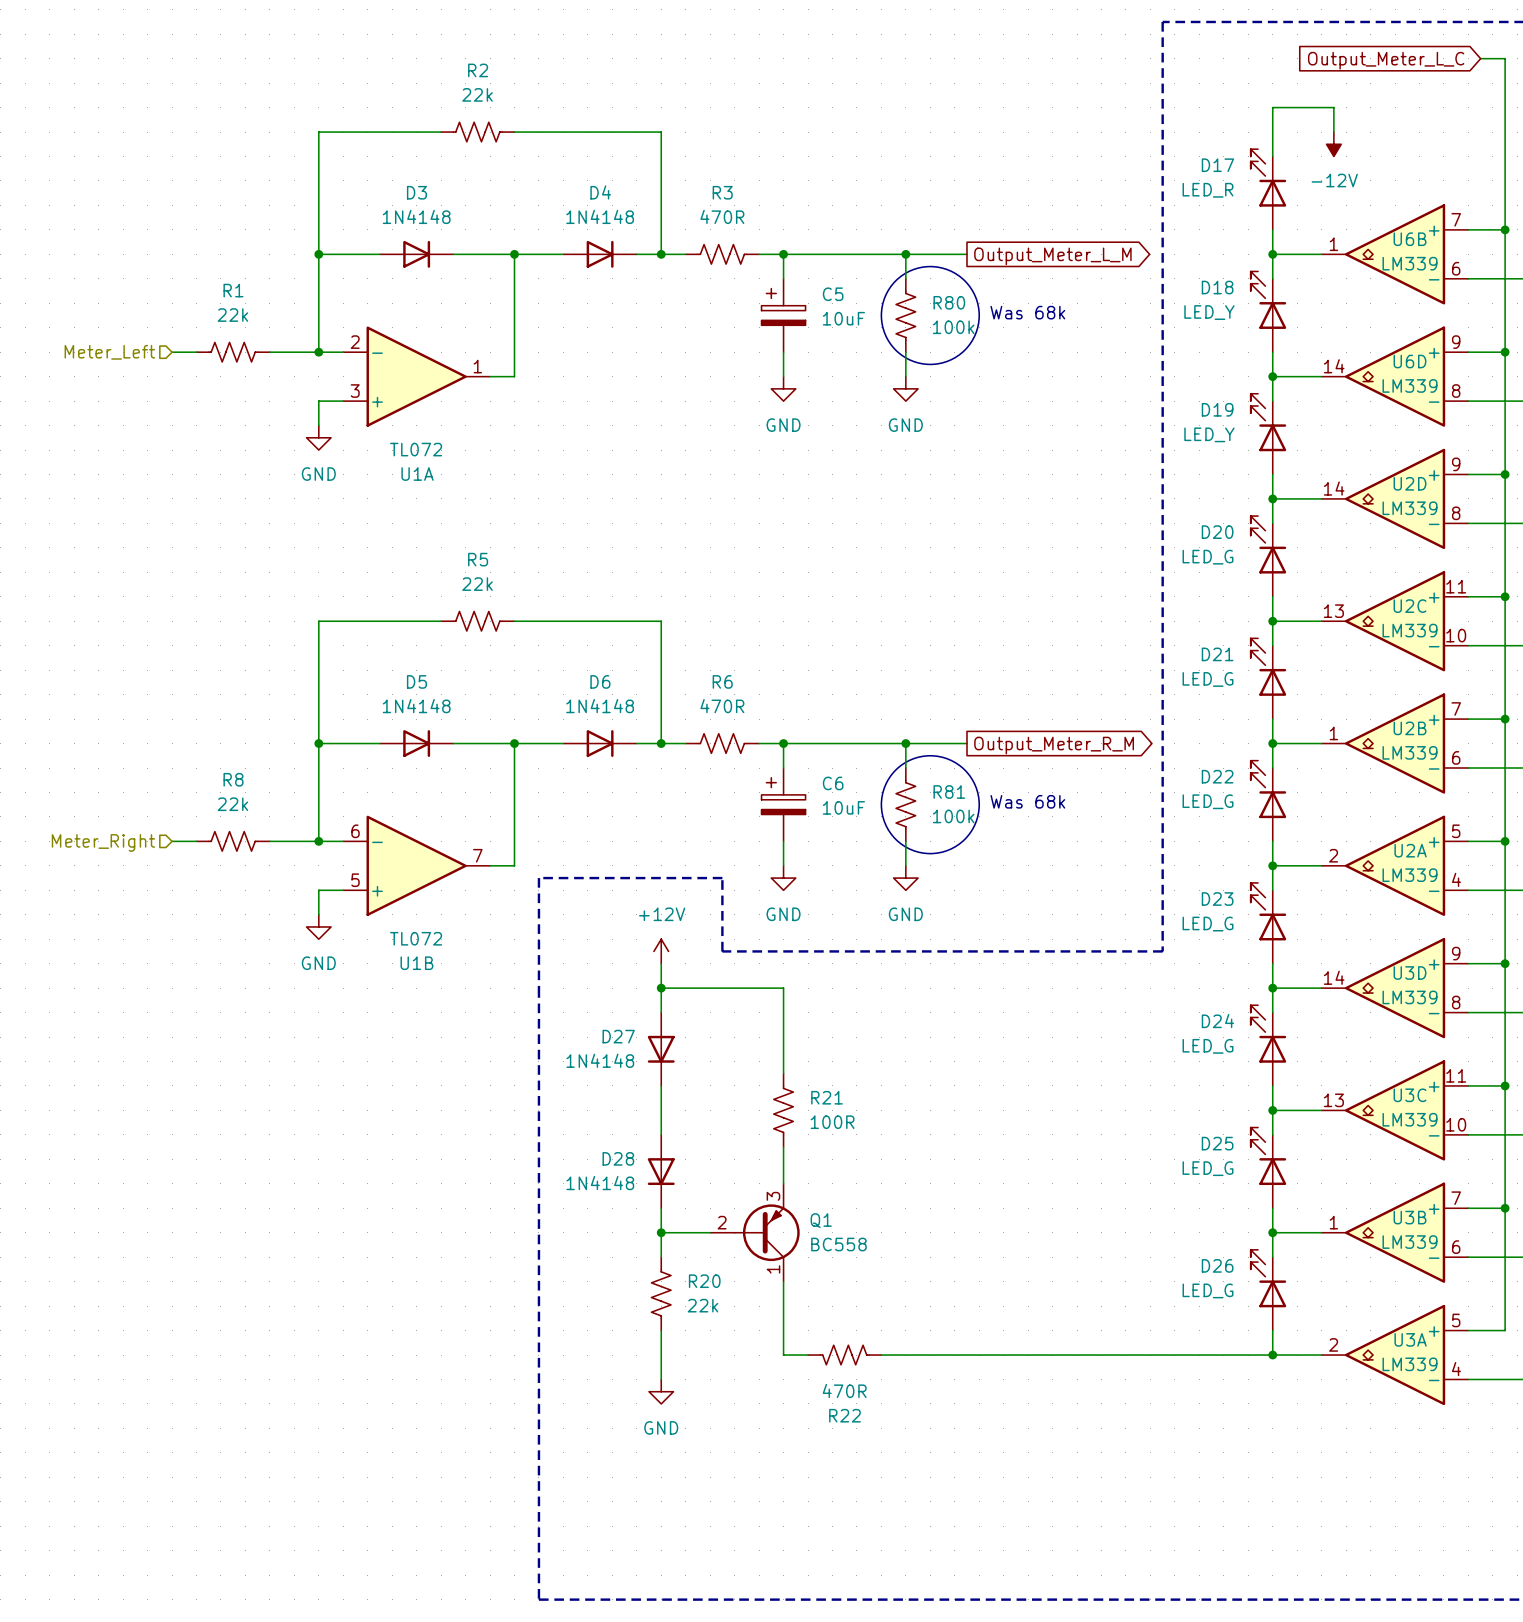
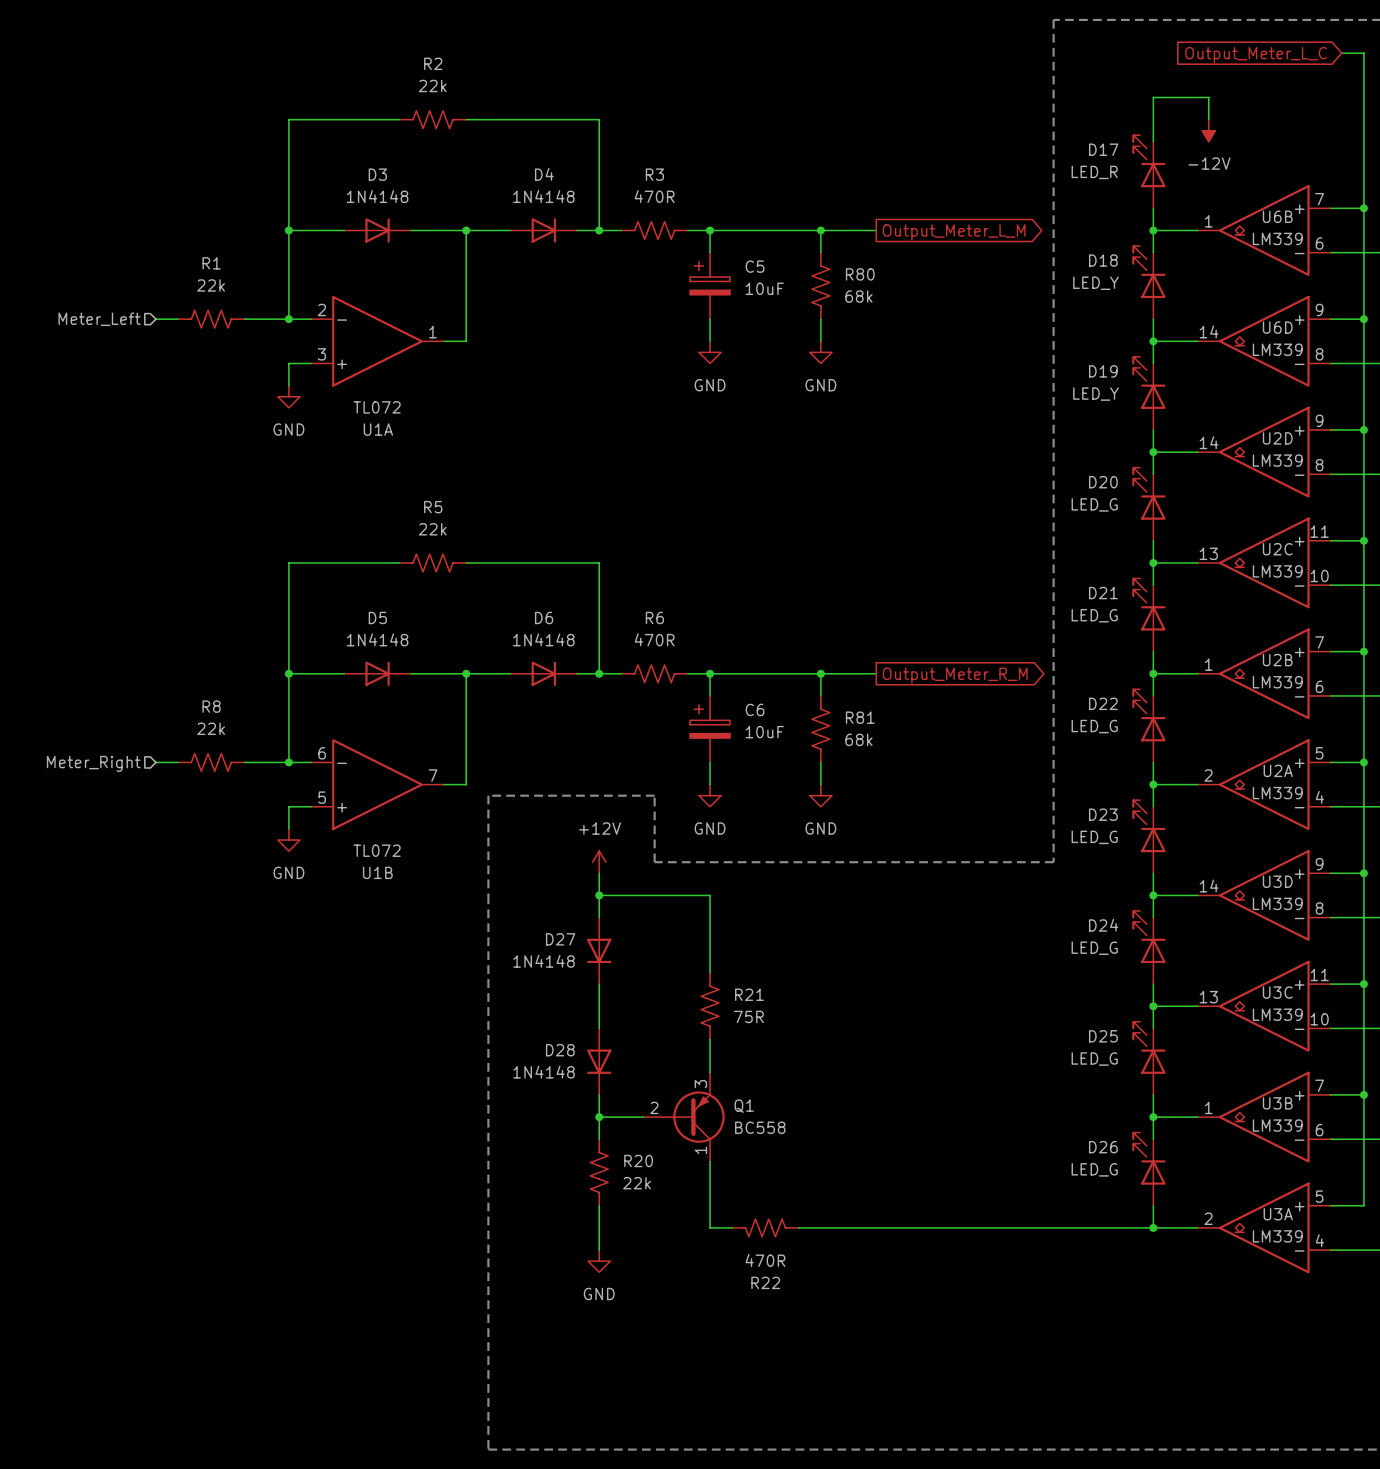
drawing: [881, 266, 980, 365] -> none
text: Was 68k (1027, 312) -> none
R80 value: 100k (953, 327) -> 68k (858, 296)
drawing: [881, 755, 980, 854] -> none
text: Was 68k (1027, 801) -> none
R81 value: 100k (953, 816) -> 68k (858, 739)
R21 value: 100R (832, 1122) -> 75R (748, 1016)

